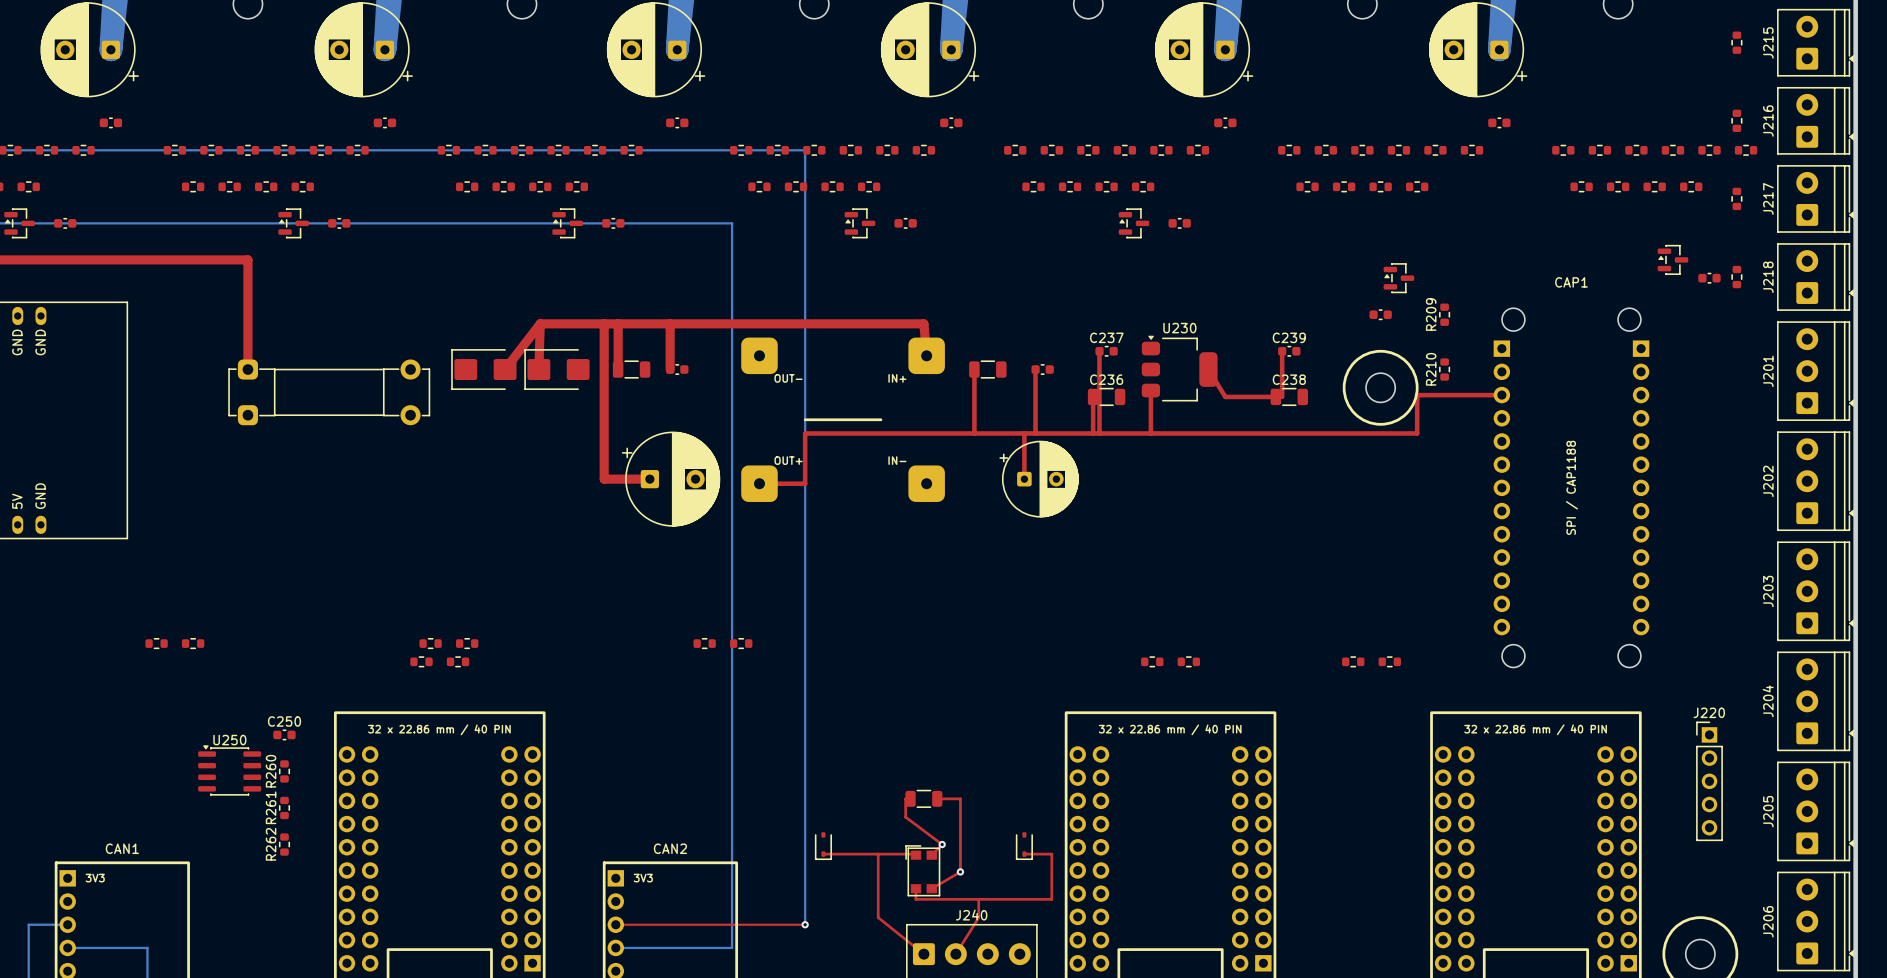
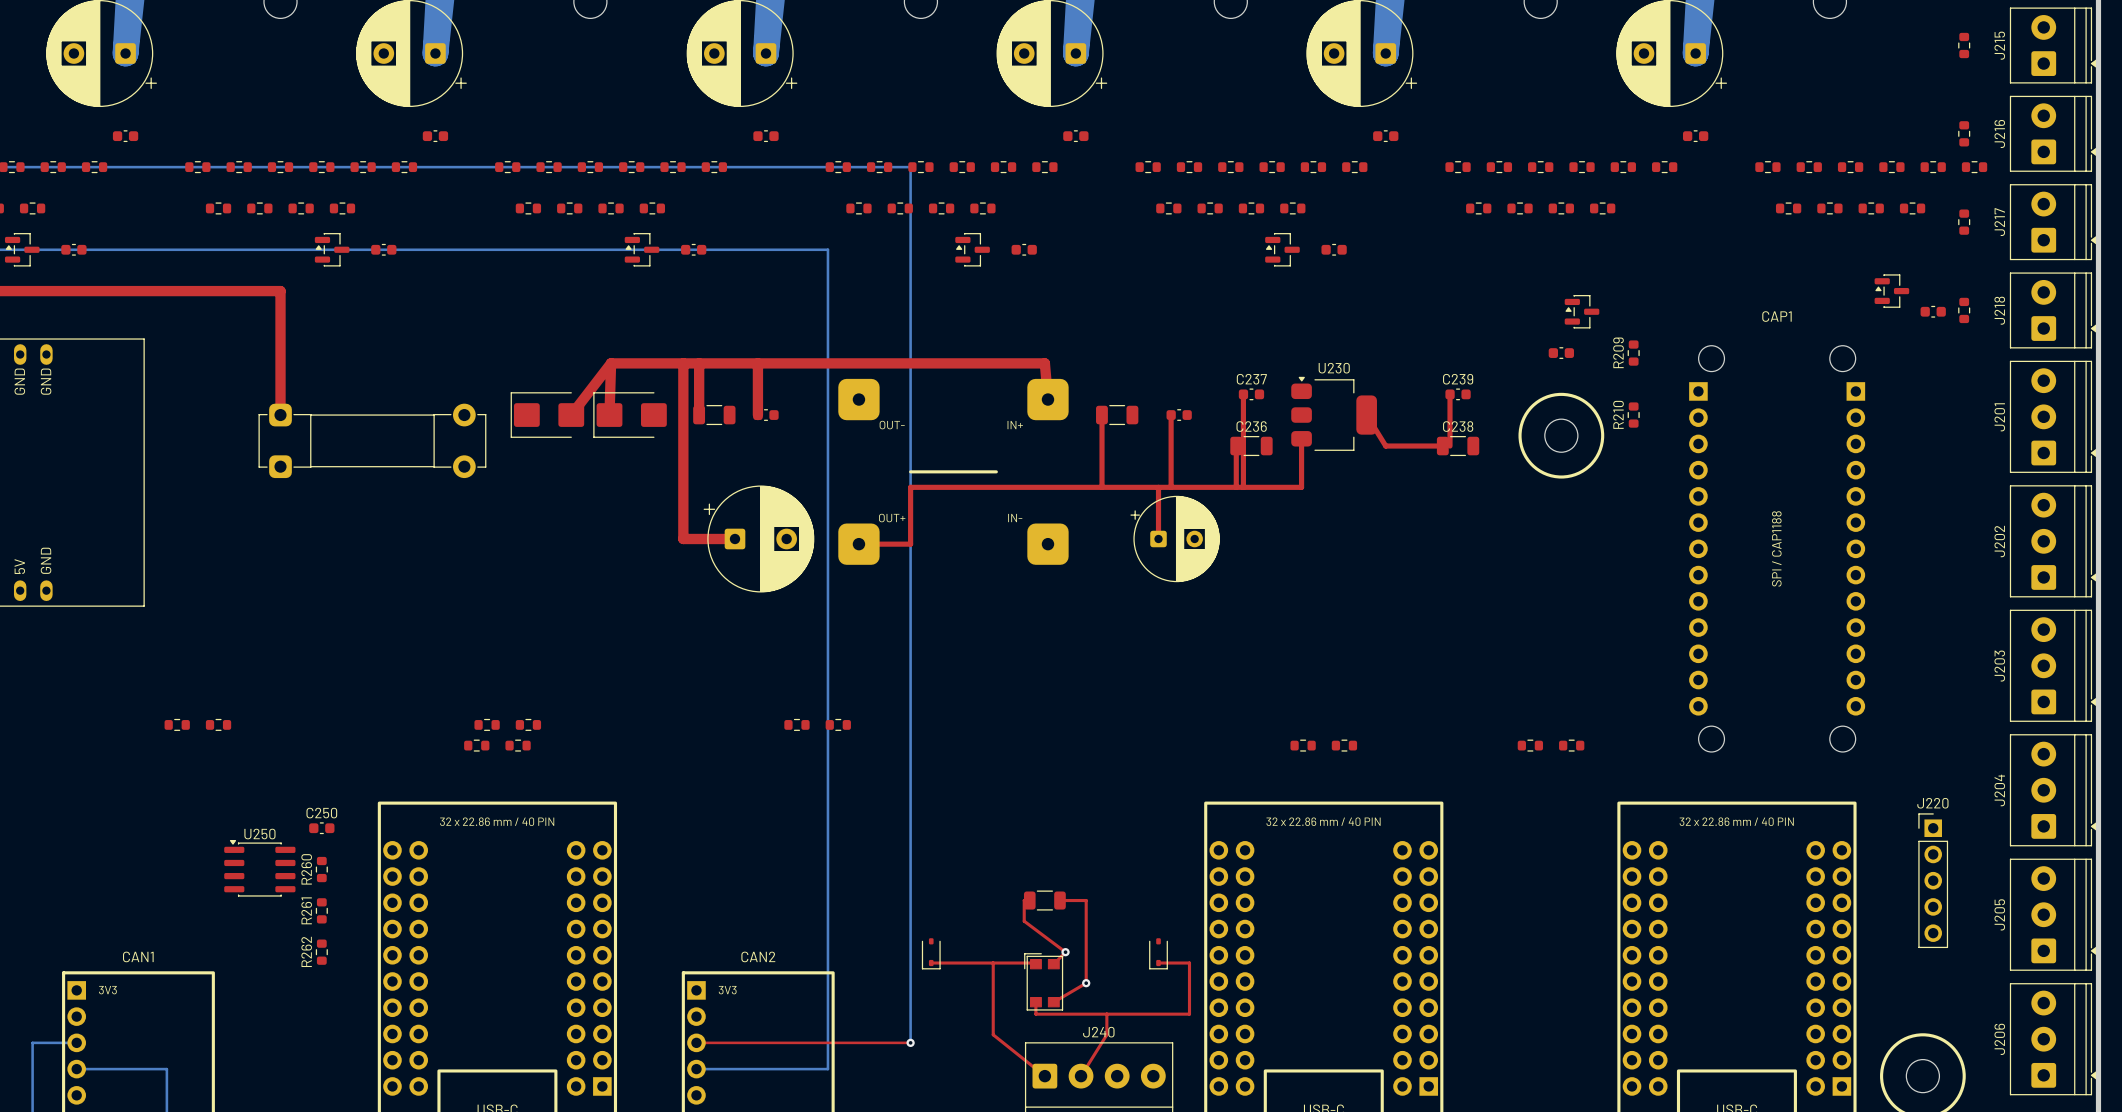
top track: (1501, 395) (1417, 395) (1417, 433) (1150, 433) -> none

